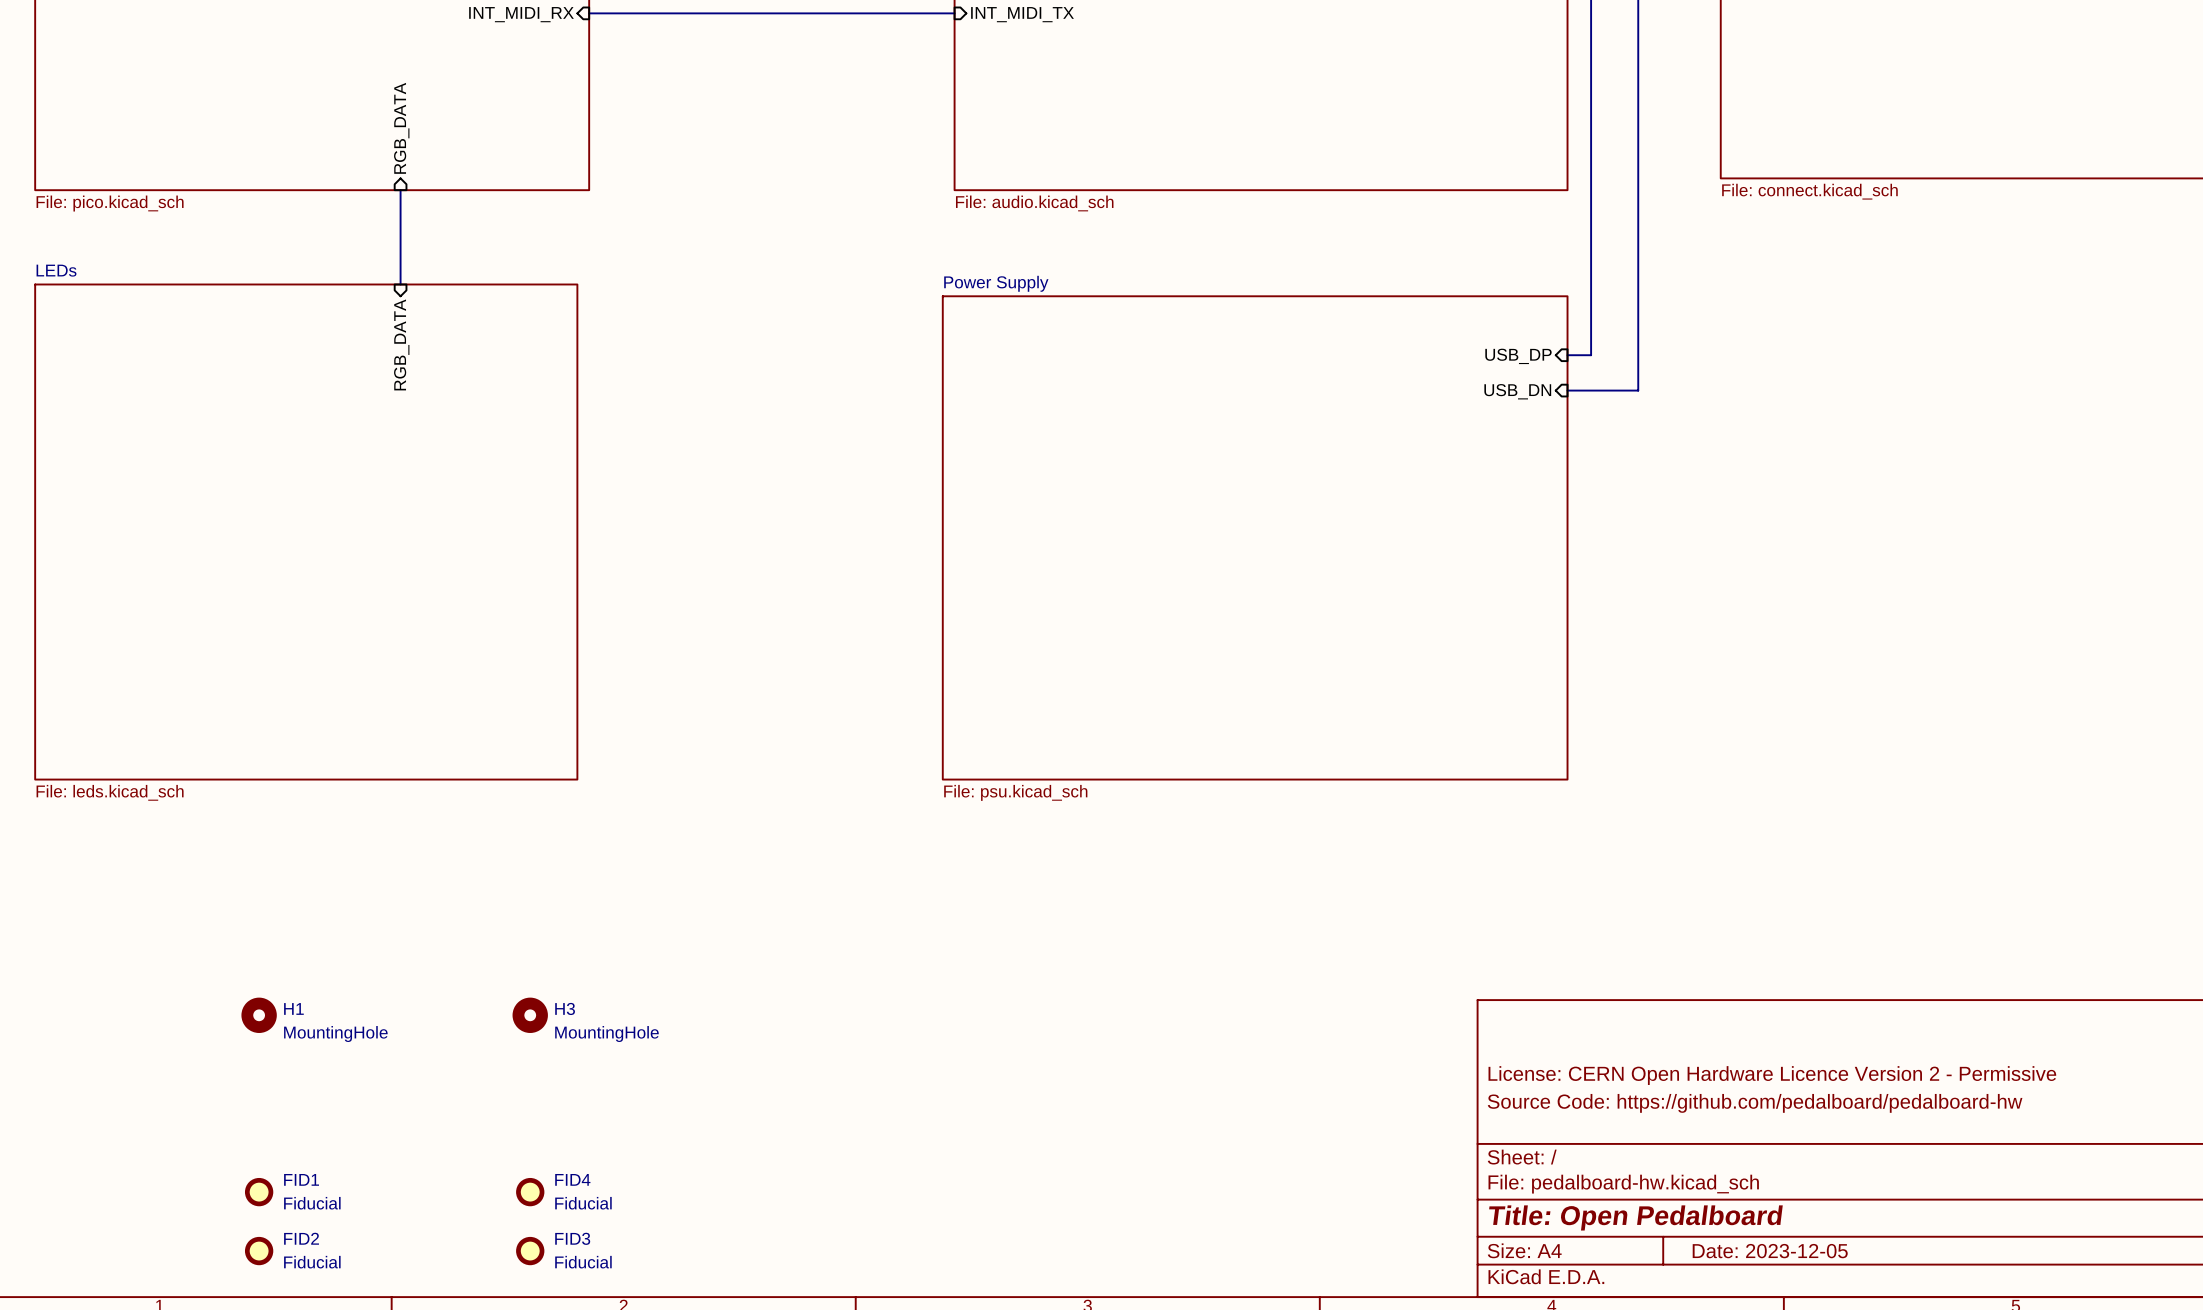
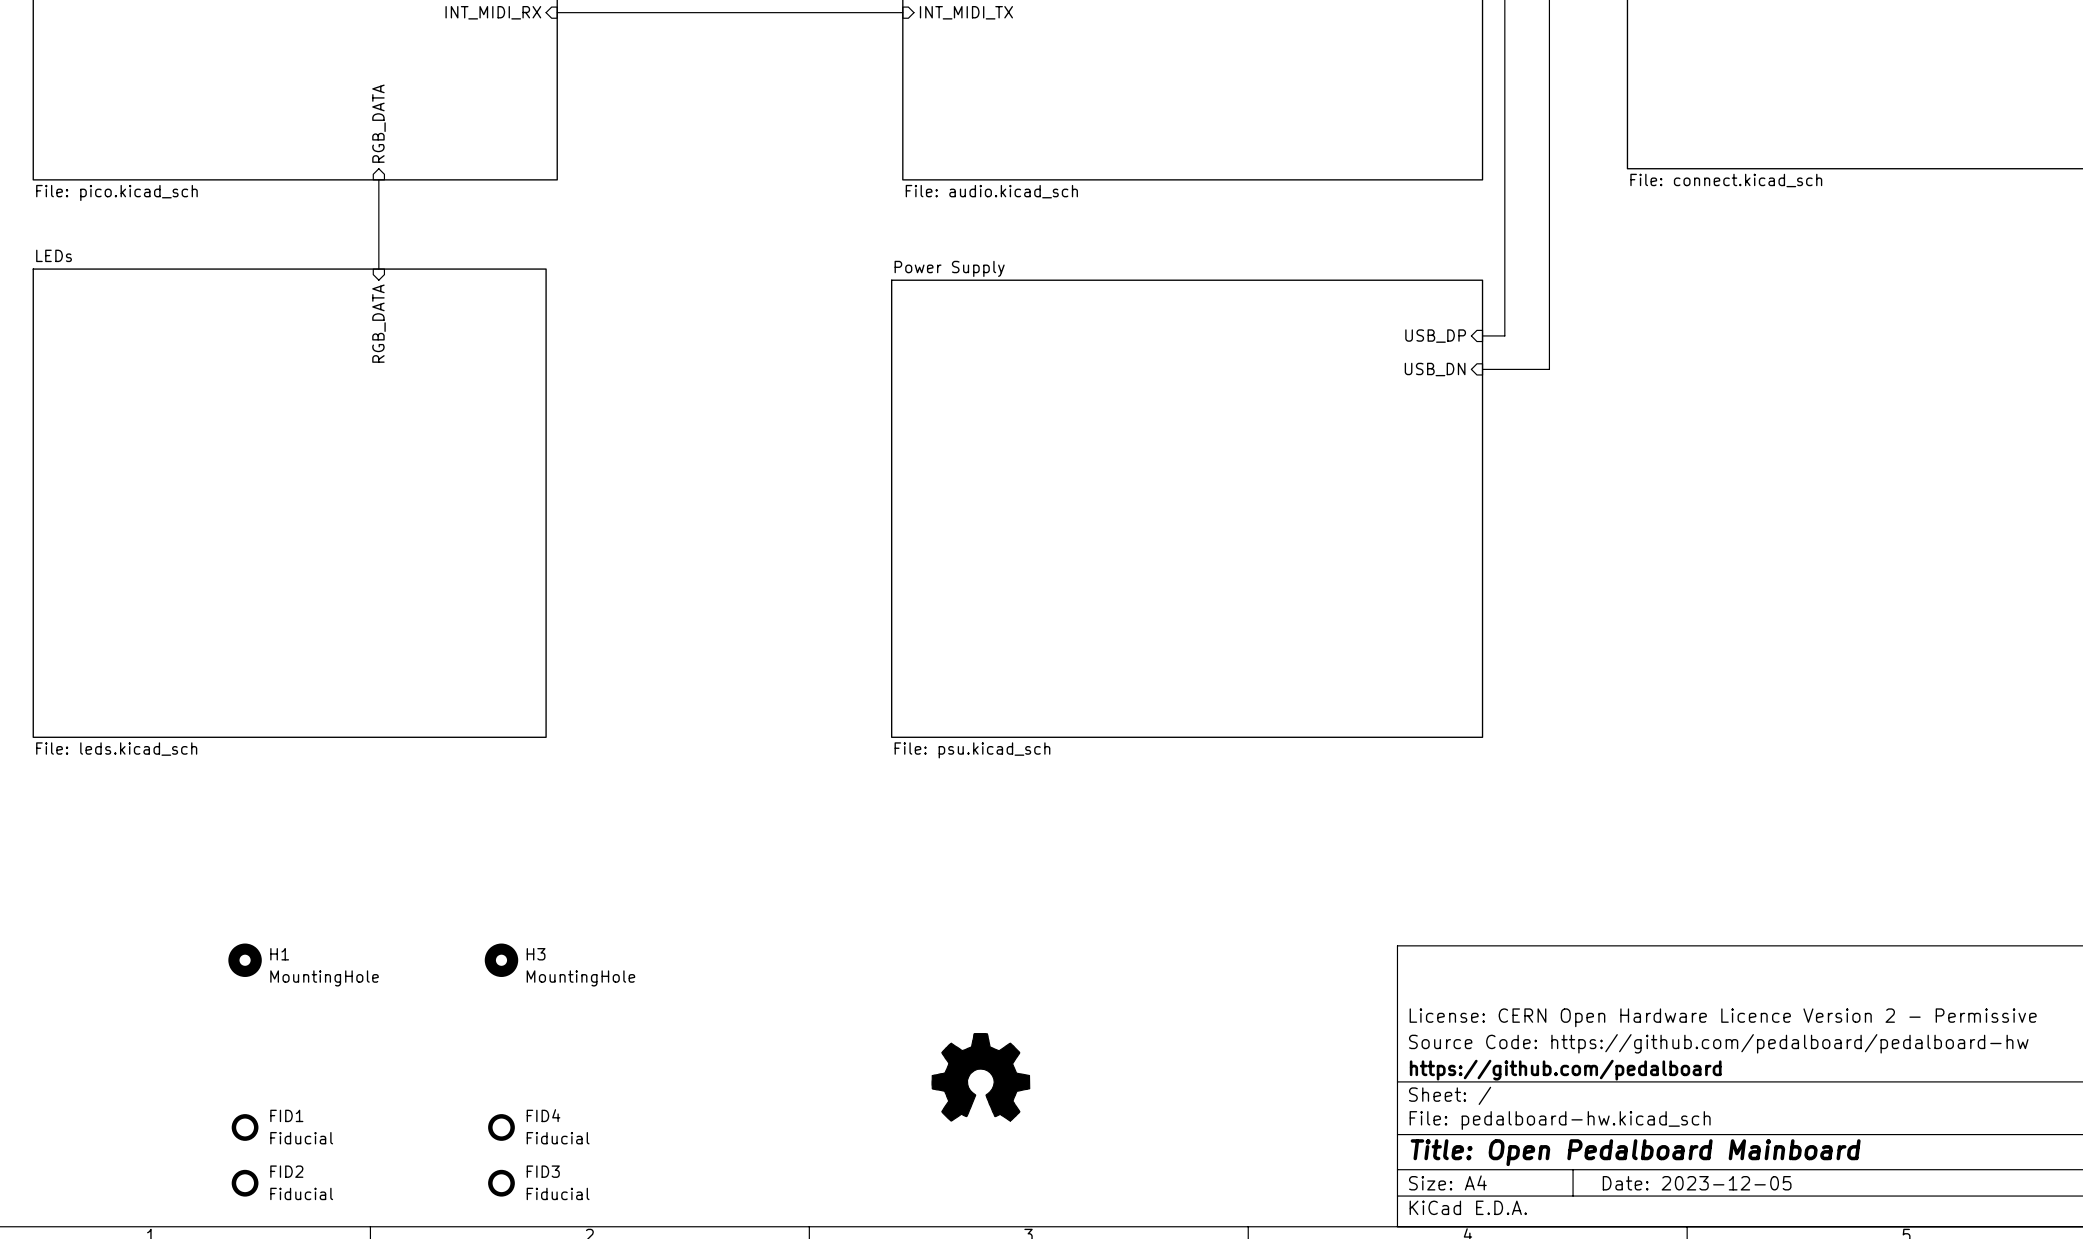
title block: none -> https://github.com/pedalboard (1565, 1070)
part: none -> (980, 1077)
title block: Title: Open Pedalboard (1635, 1217) -> Title: Open Pedalboard Mainboard (1635, 1152)

